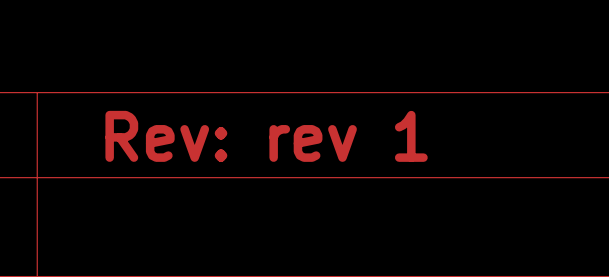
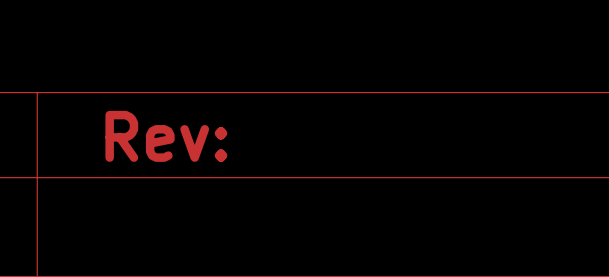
title block: Rev: rev 1 (266, 136) -> Rev: (166, 136)

